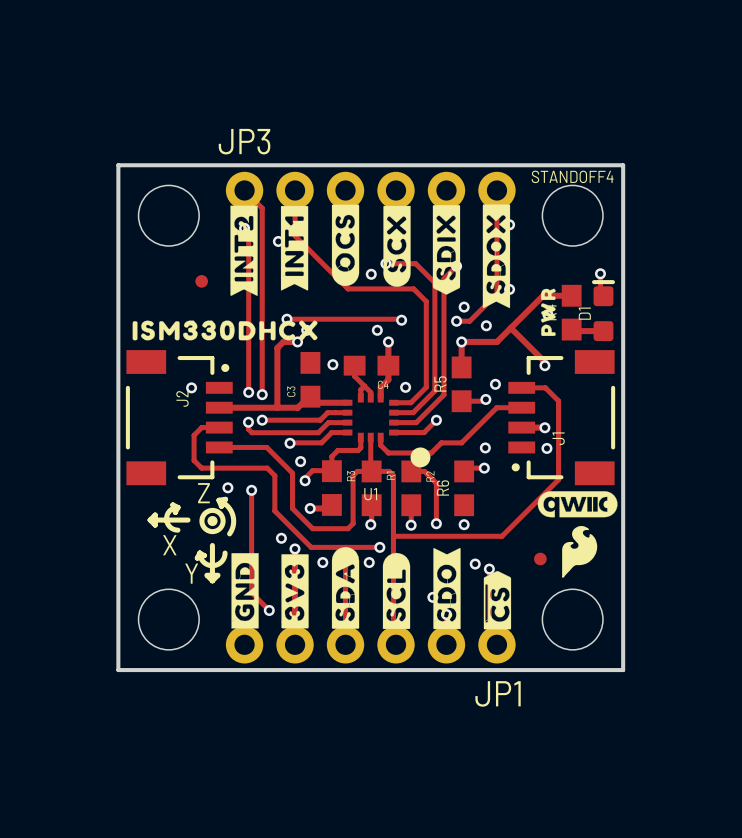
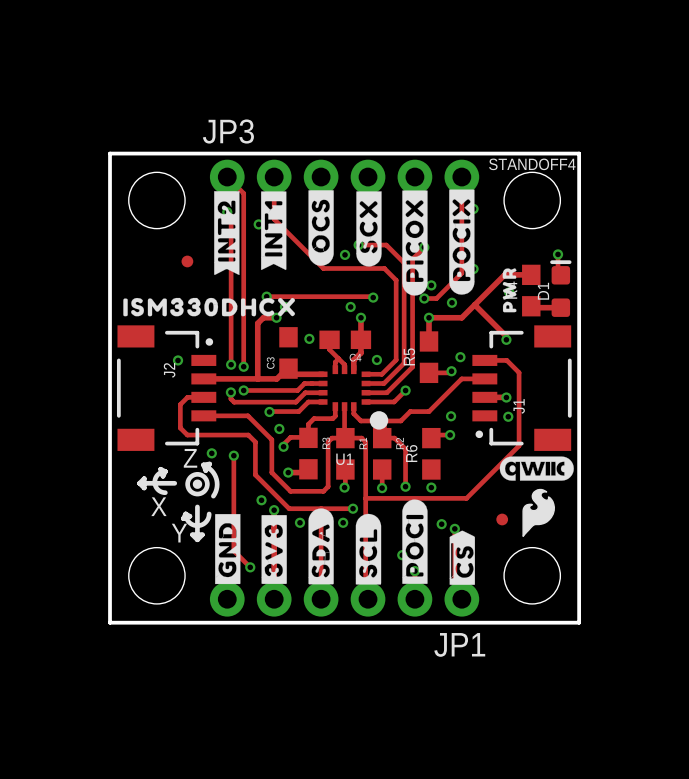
drawing shape: [482, 204, 511, 309] -> [449, 189, 475, 295]
drawing shape: [432, 205, 461, 295] -> [402, 190, 428, 296]
U1 footprint: [342, 393, 431, 468] -> [318, 365, 389, 430]
drawing shape: [433, 548, 461, 630] -> [402, 499, 428, 584]

